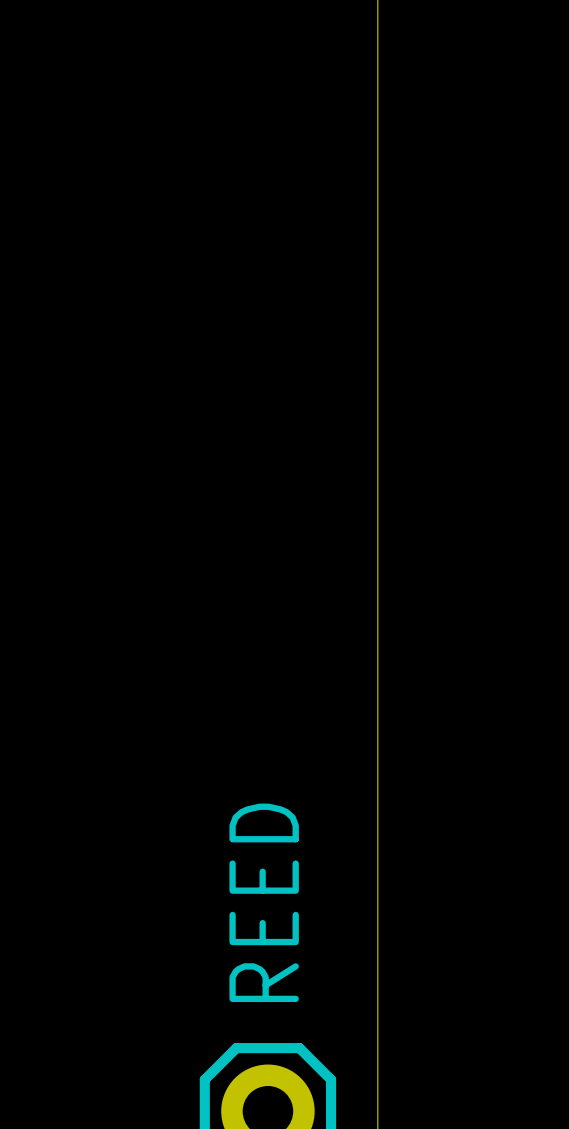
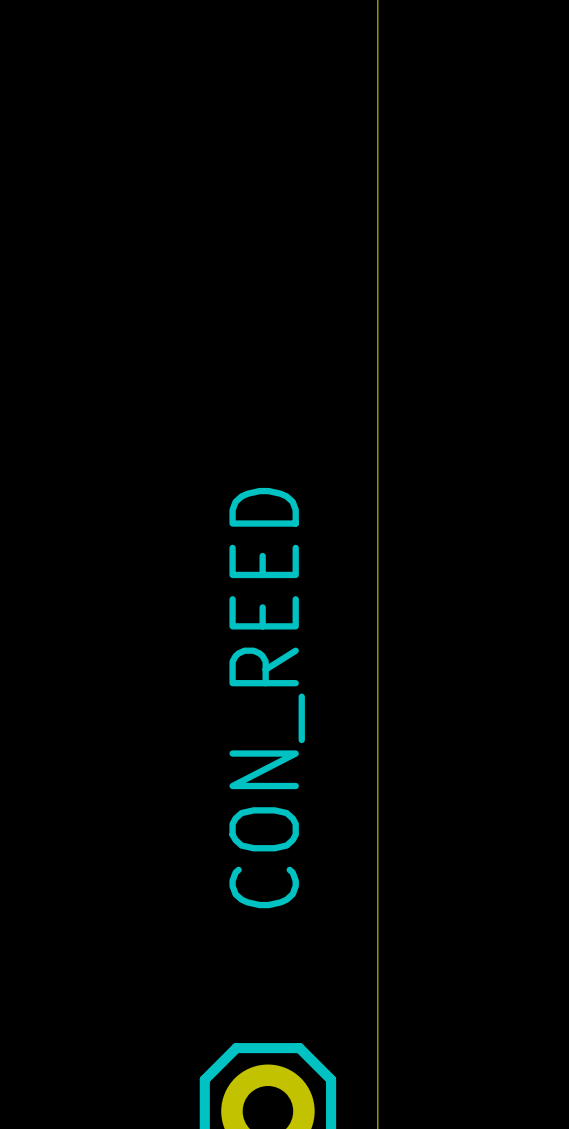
REED name: REED (264, 902) -> CON_REED (267, 698)

